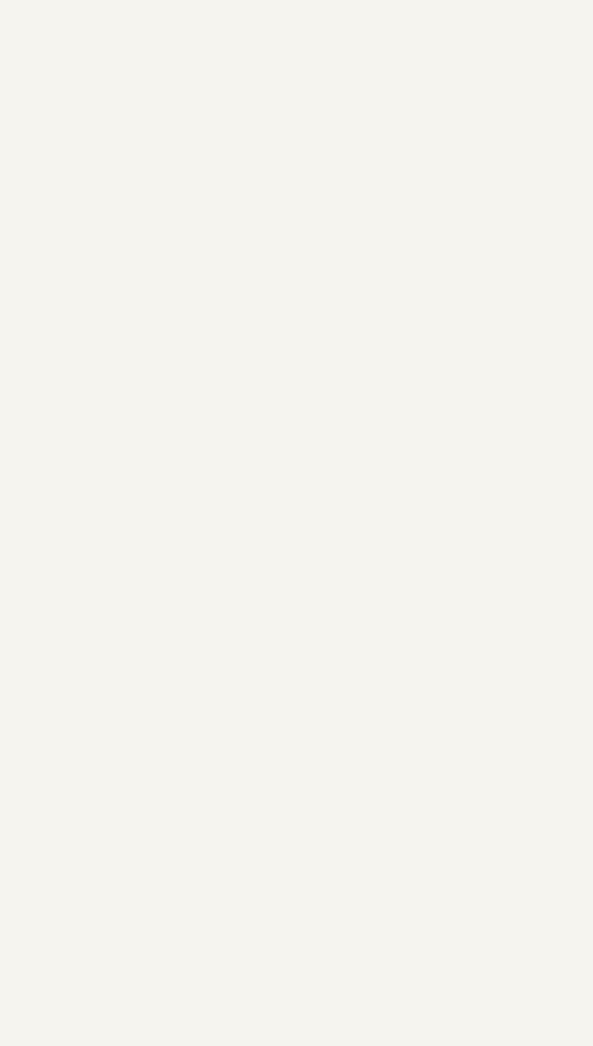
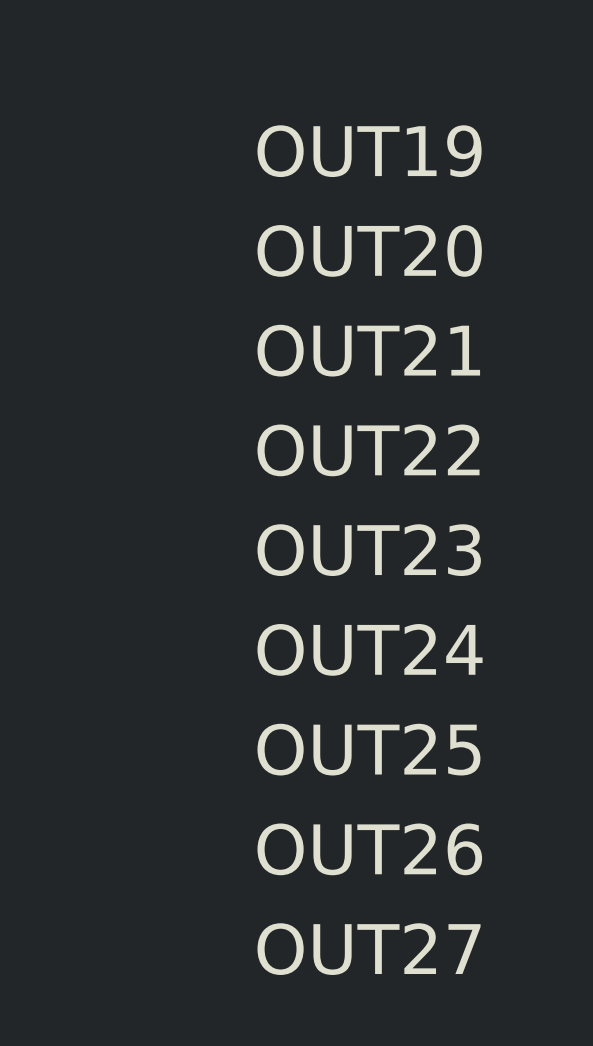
label: none -> OUT19 (369, 151)
label: none -> OUT20 (369, 250)
label: none -> OUT21 (368, 350)
label: none -> OUT22 (368, 450)
label: none -> OUT23 (369, 550)
label: none -> OUT24 (370, 649)
label: none -> OUT25 (368, 749)
label: none -> OUT26 (369, 849)
label: none -> OUT27 (369, 949)

